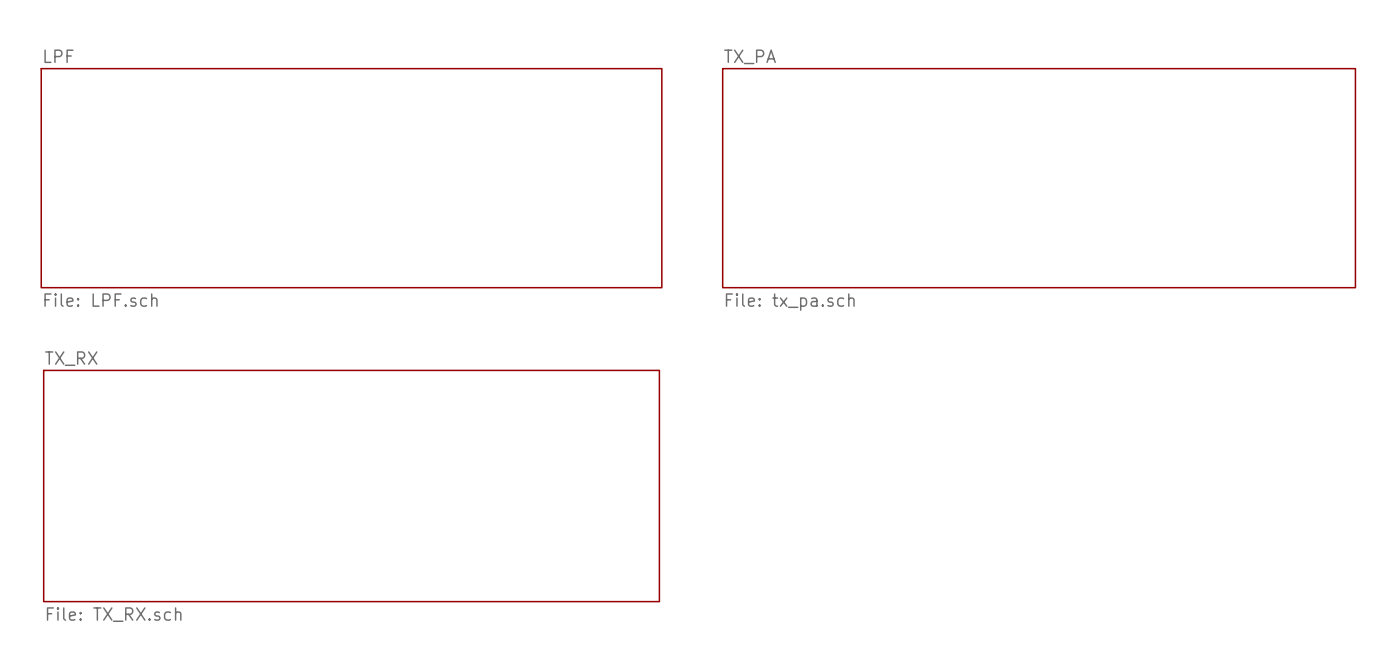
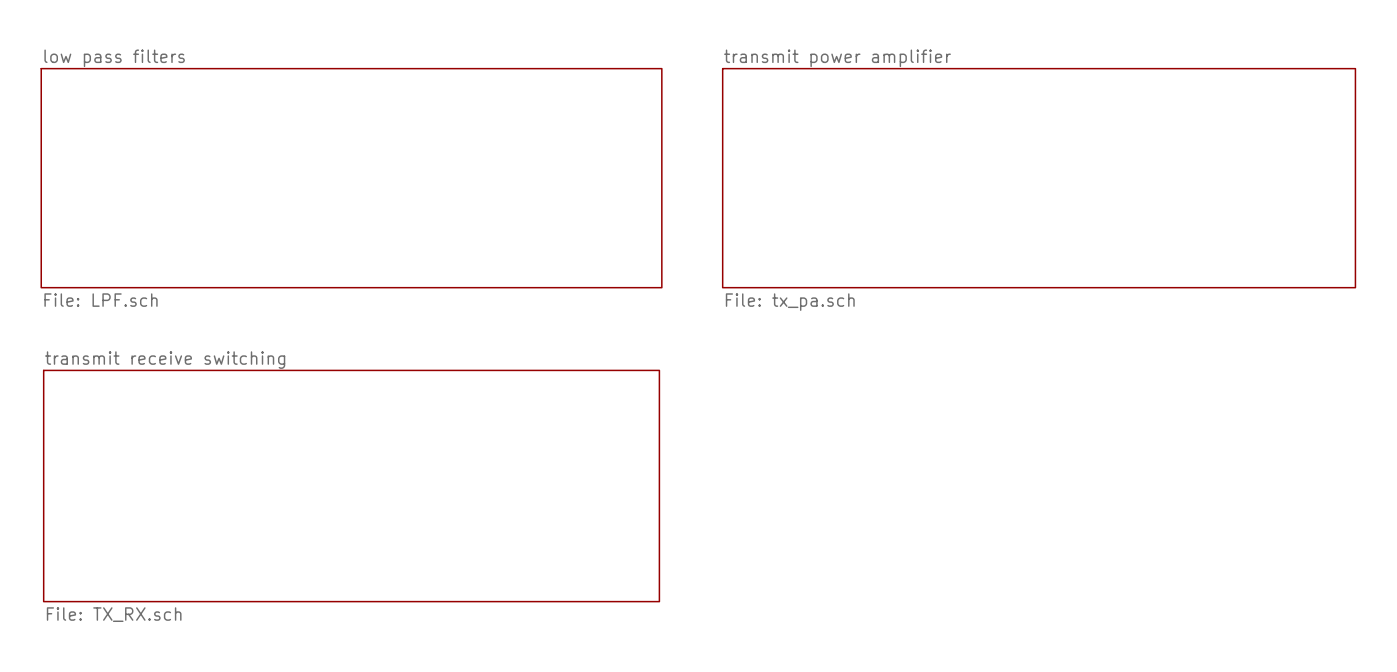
sheet LPF name: LPF (59, 56) -> low pass filters (114, 58)
sheet TX_PA name: TX_PA (750, 56) -> transmit power amplifier (837, 58)
sheet TX_RX name: TX_RX (71, 358) -> transmit receive switching (165, 360)

